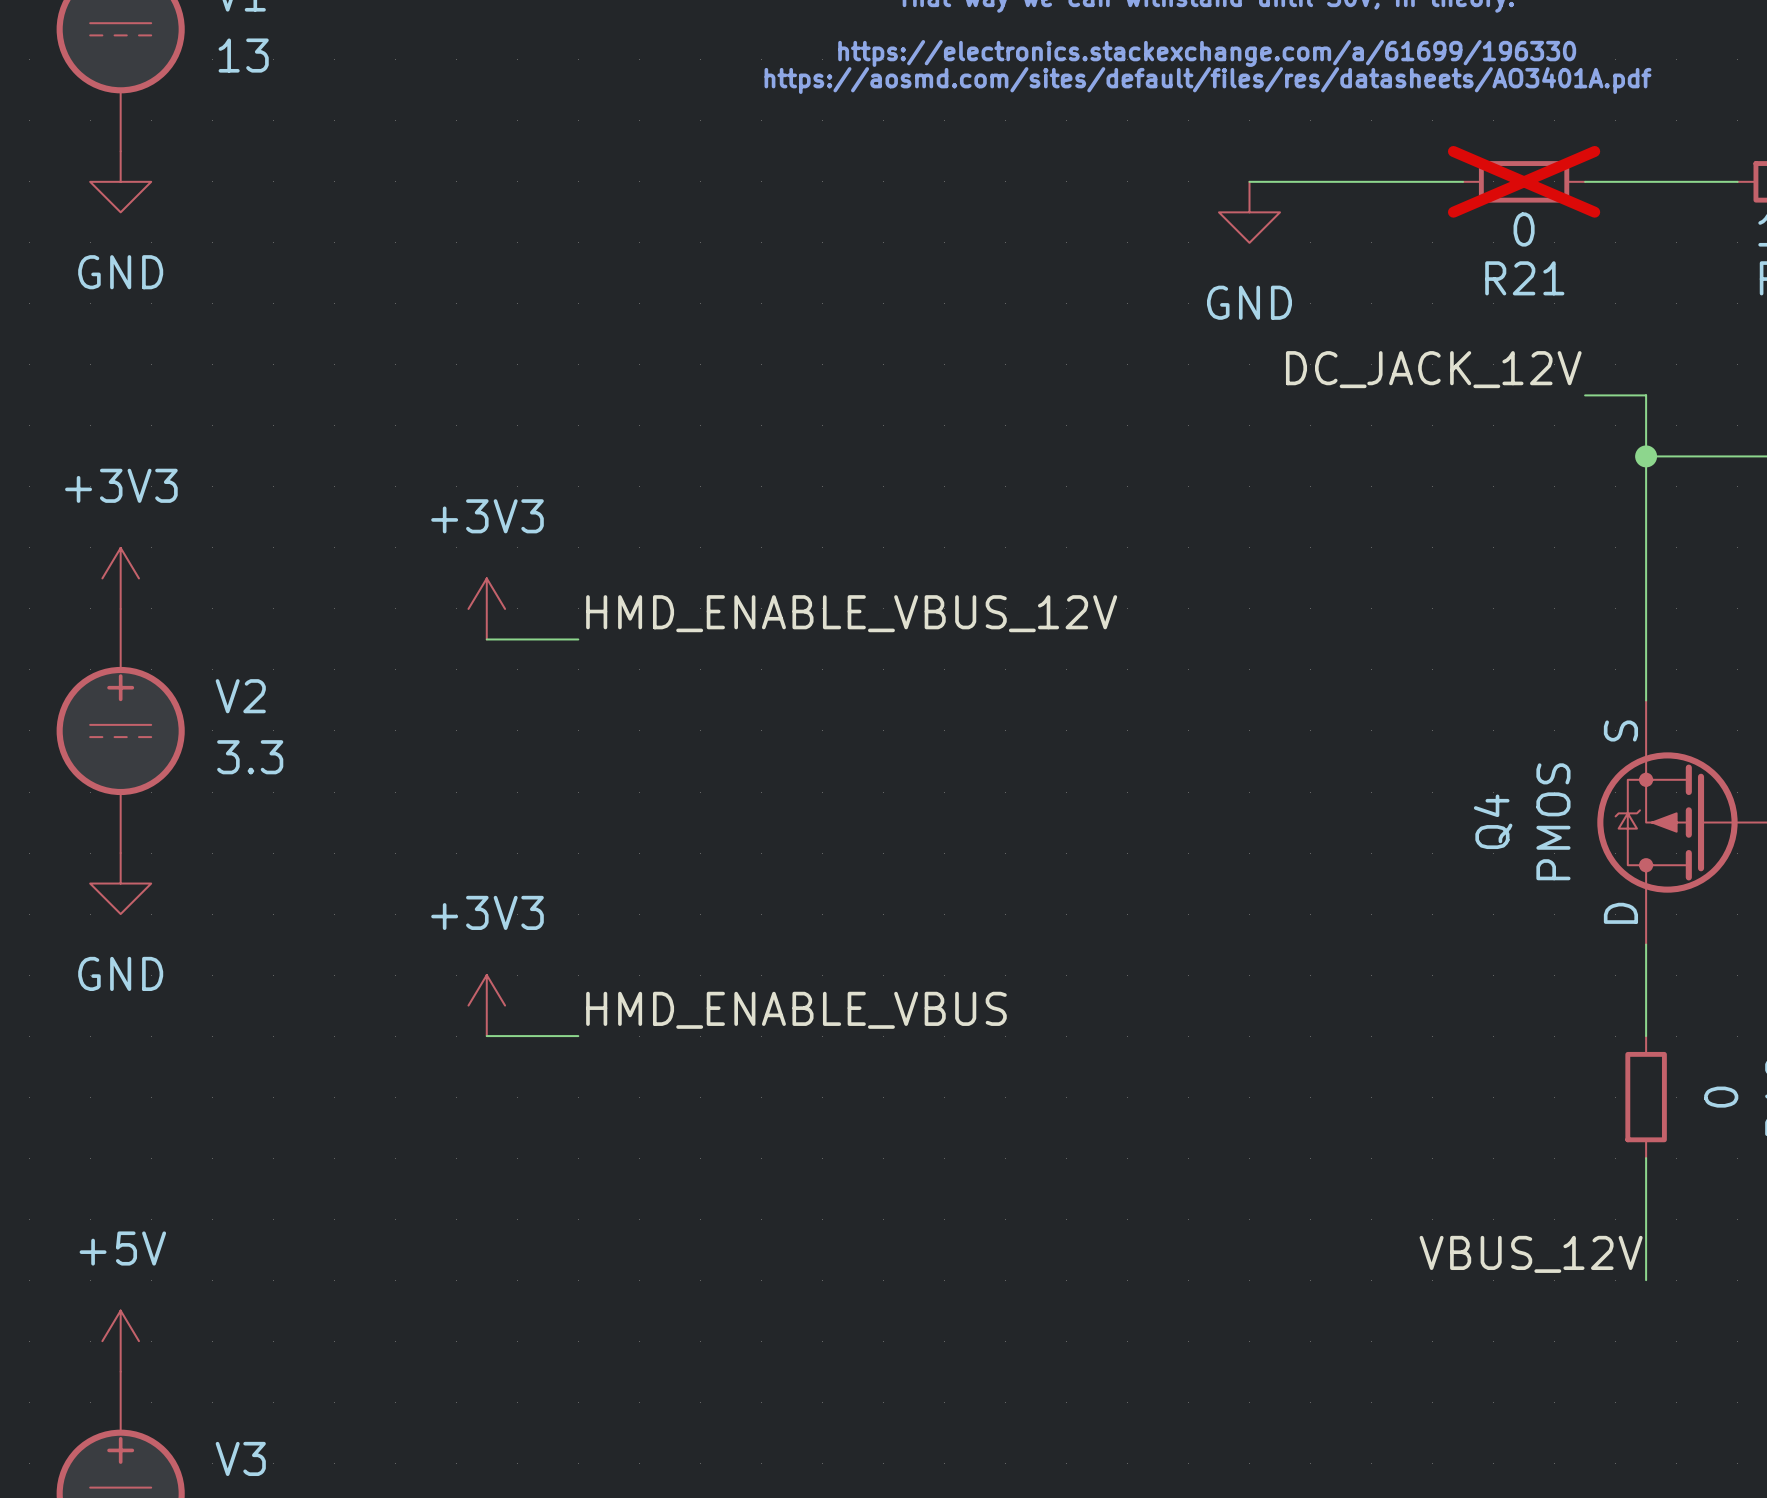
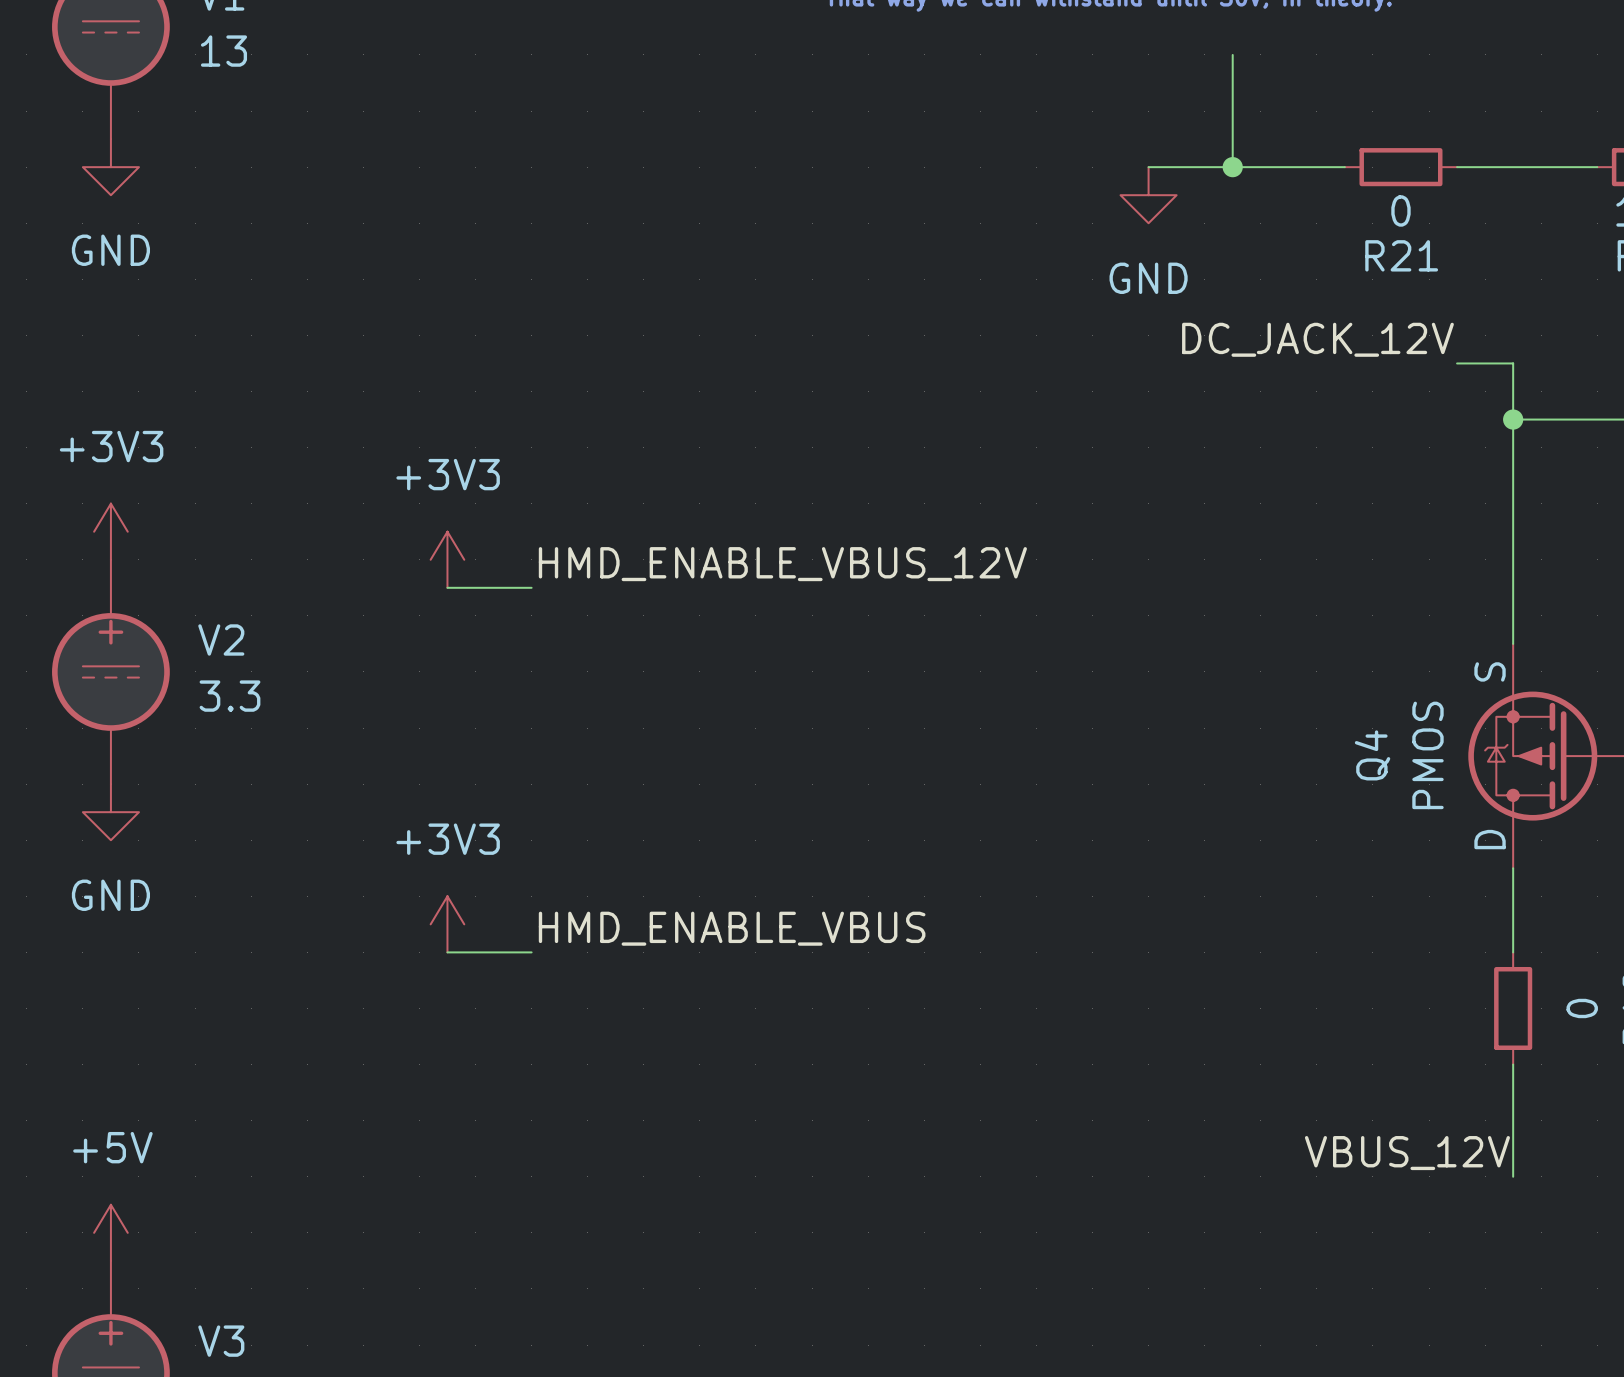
text: https://electronics.stackexchange.com/a/61699/196330 (1207, 53) -> none
wire: none -> (1232, 54) (1232, 167)
text: https://aosmd.com/sites/default/files/res/datasheets/AO3401A.pdf (1207, 80) -> none
junction: none -> (1232, 167)
R21 do-not-place cross: (1524, 181) -> none

